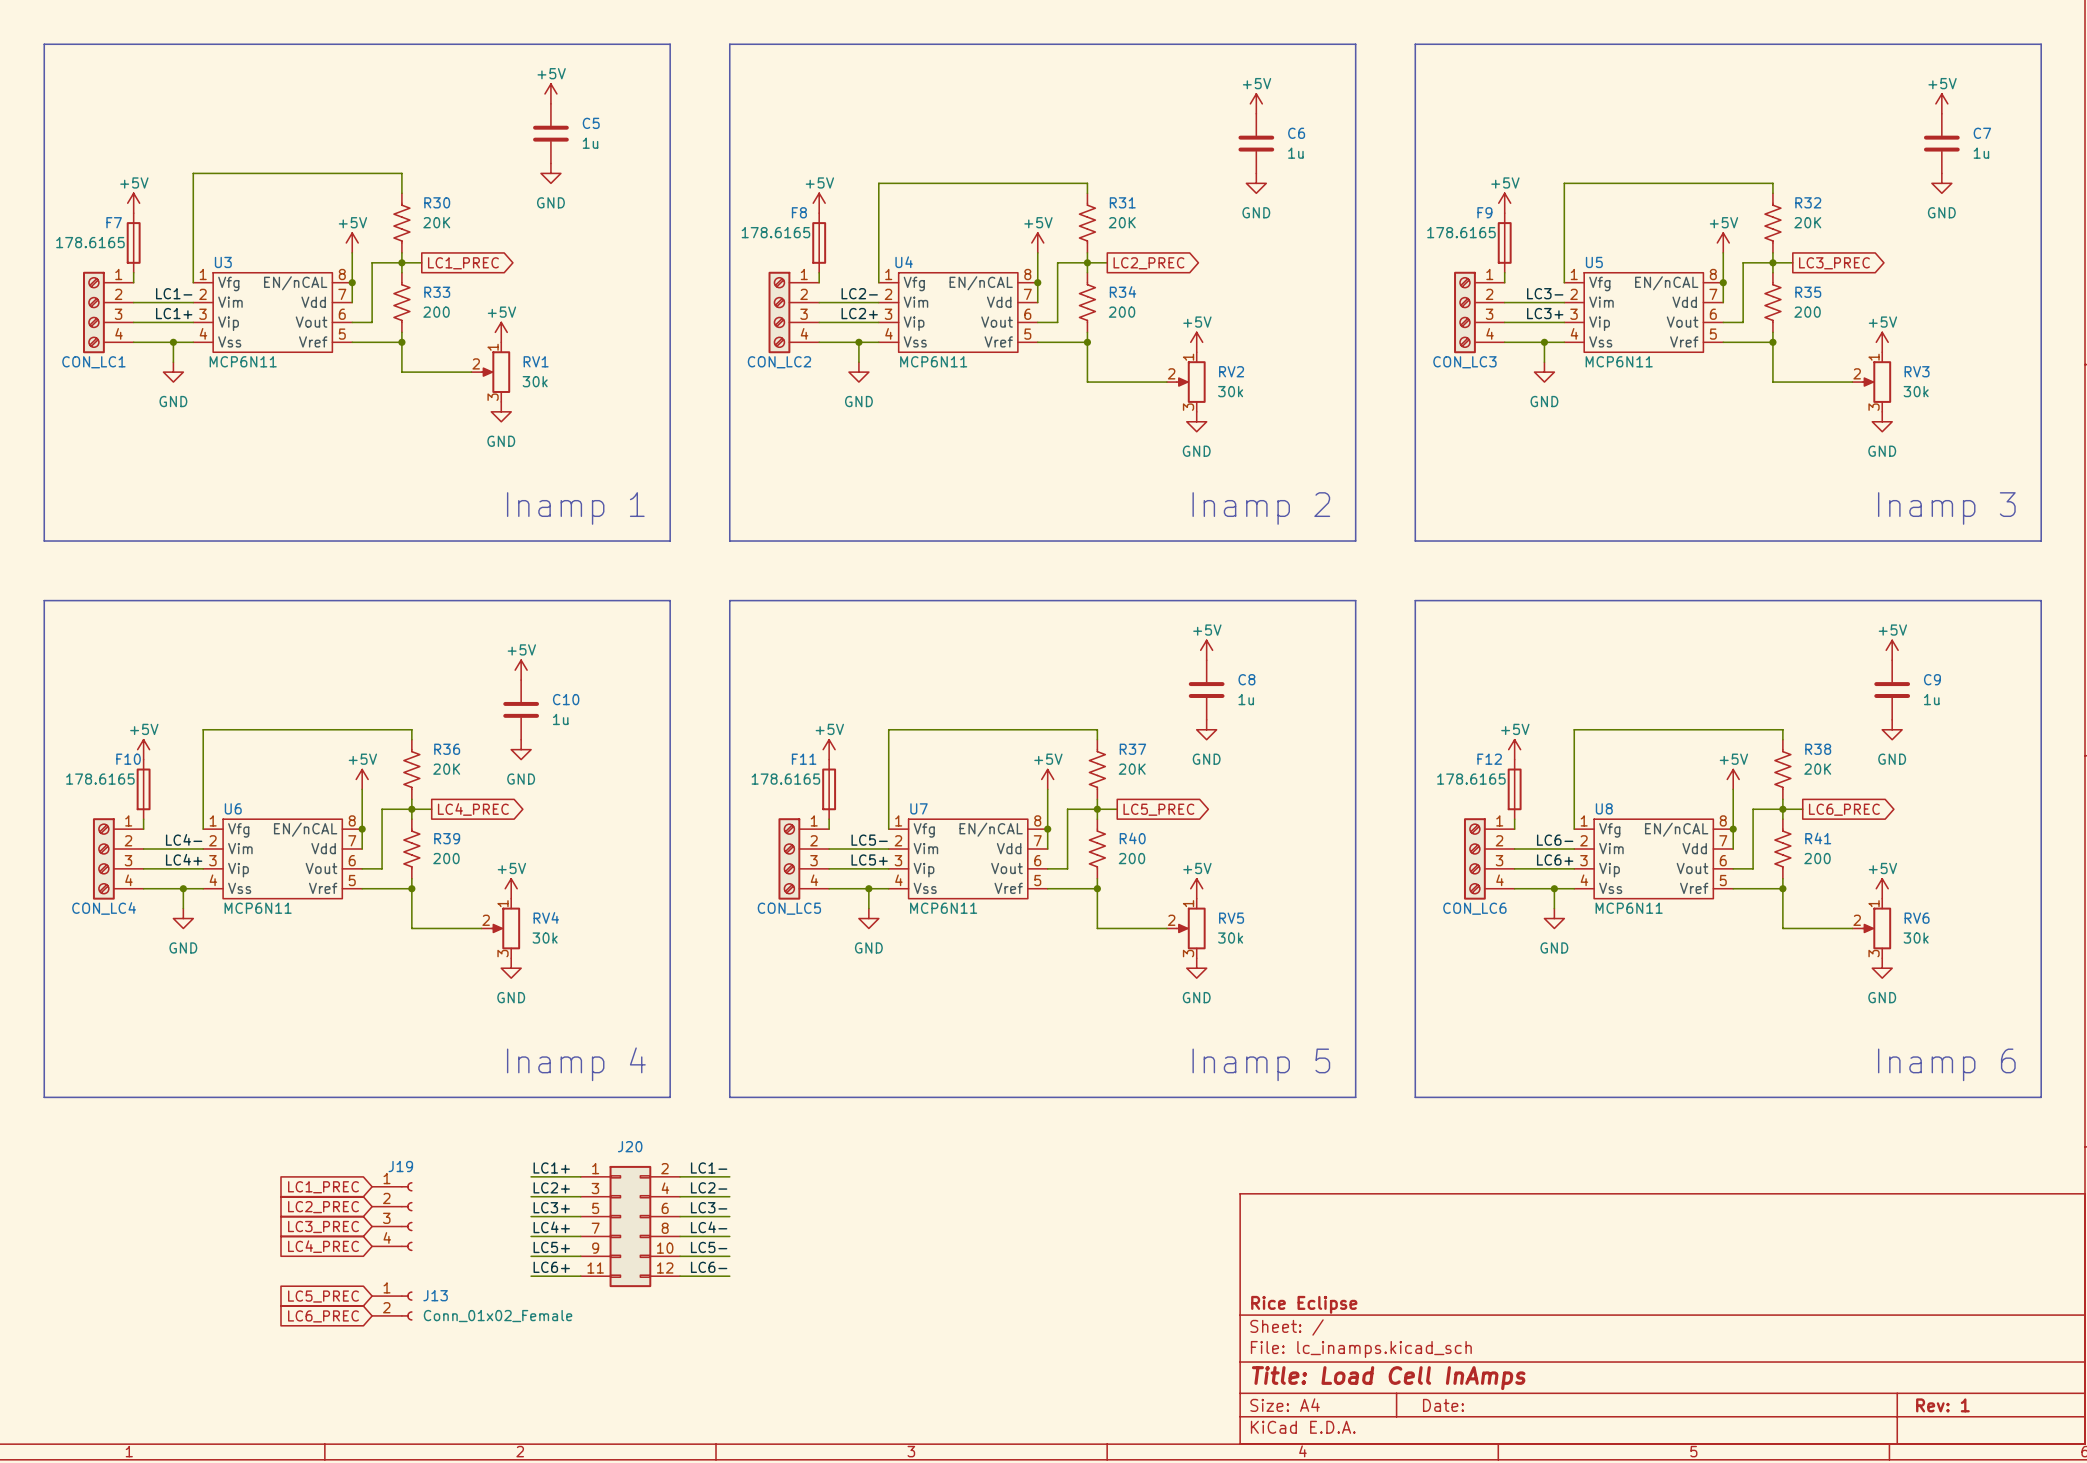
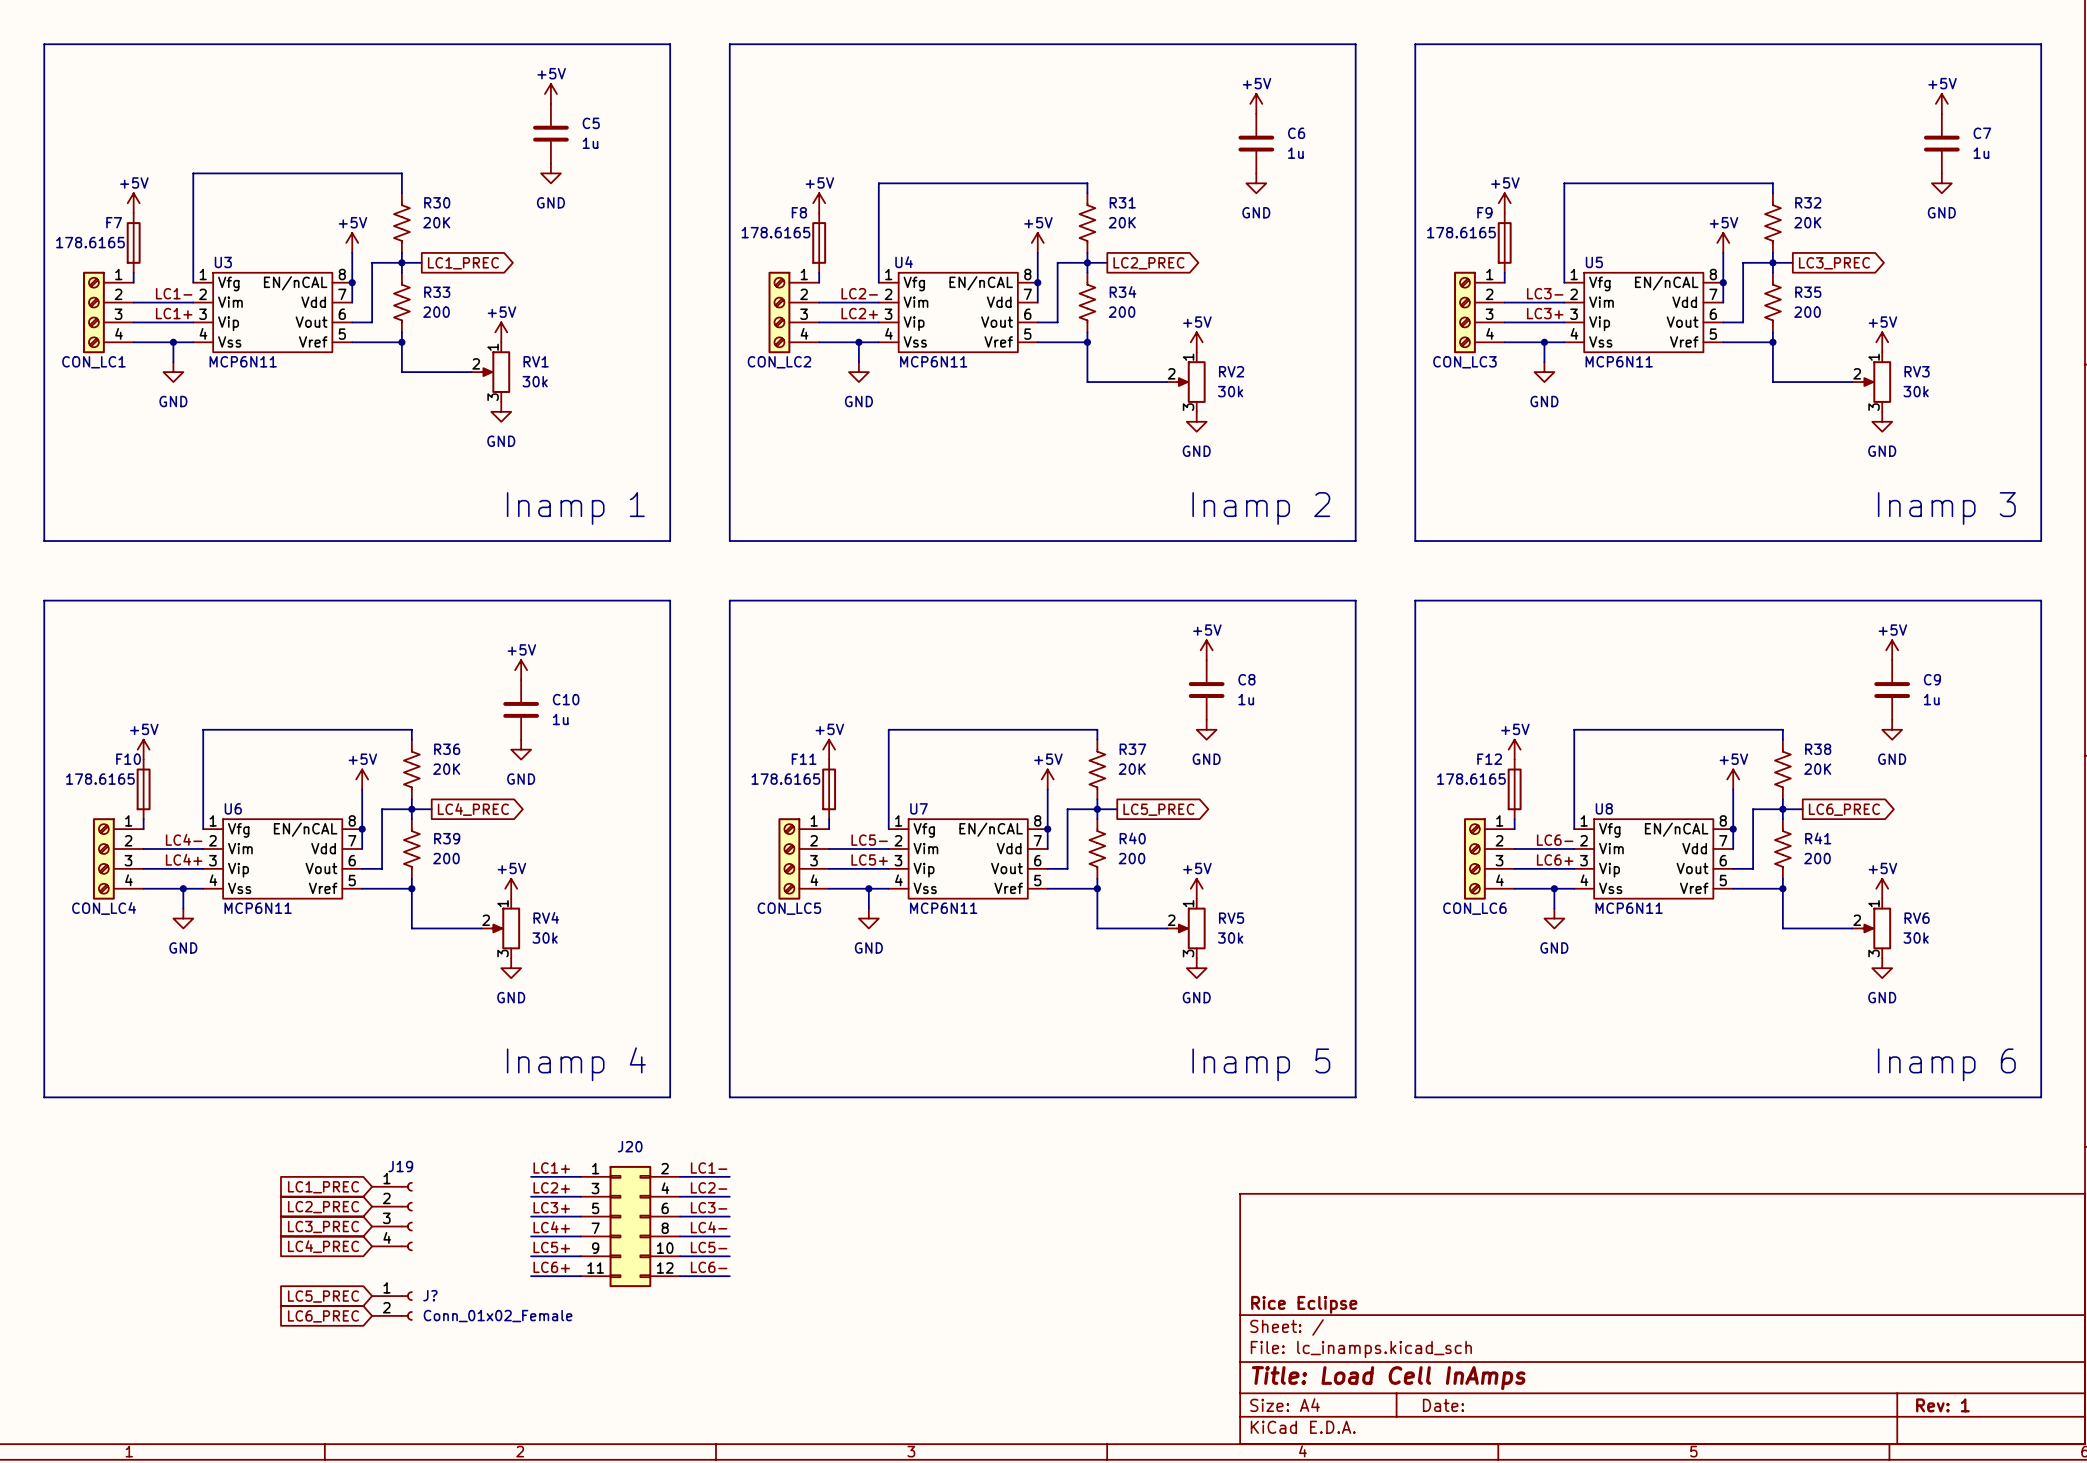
J13 name: J13 (435, 1295) -> J? (430, 1295)

